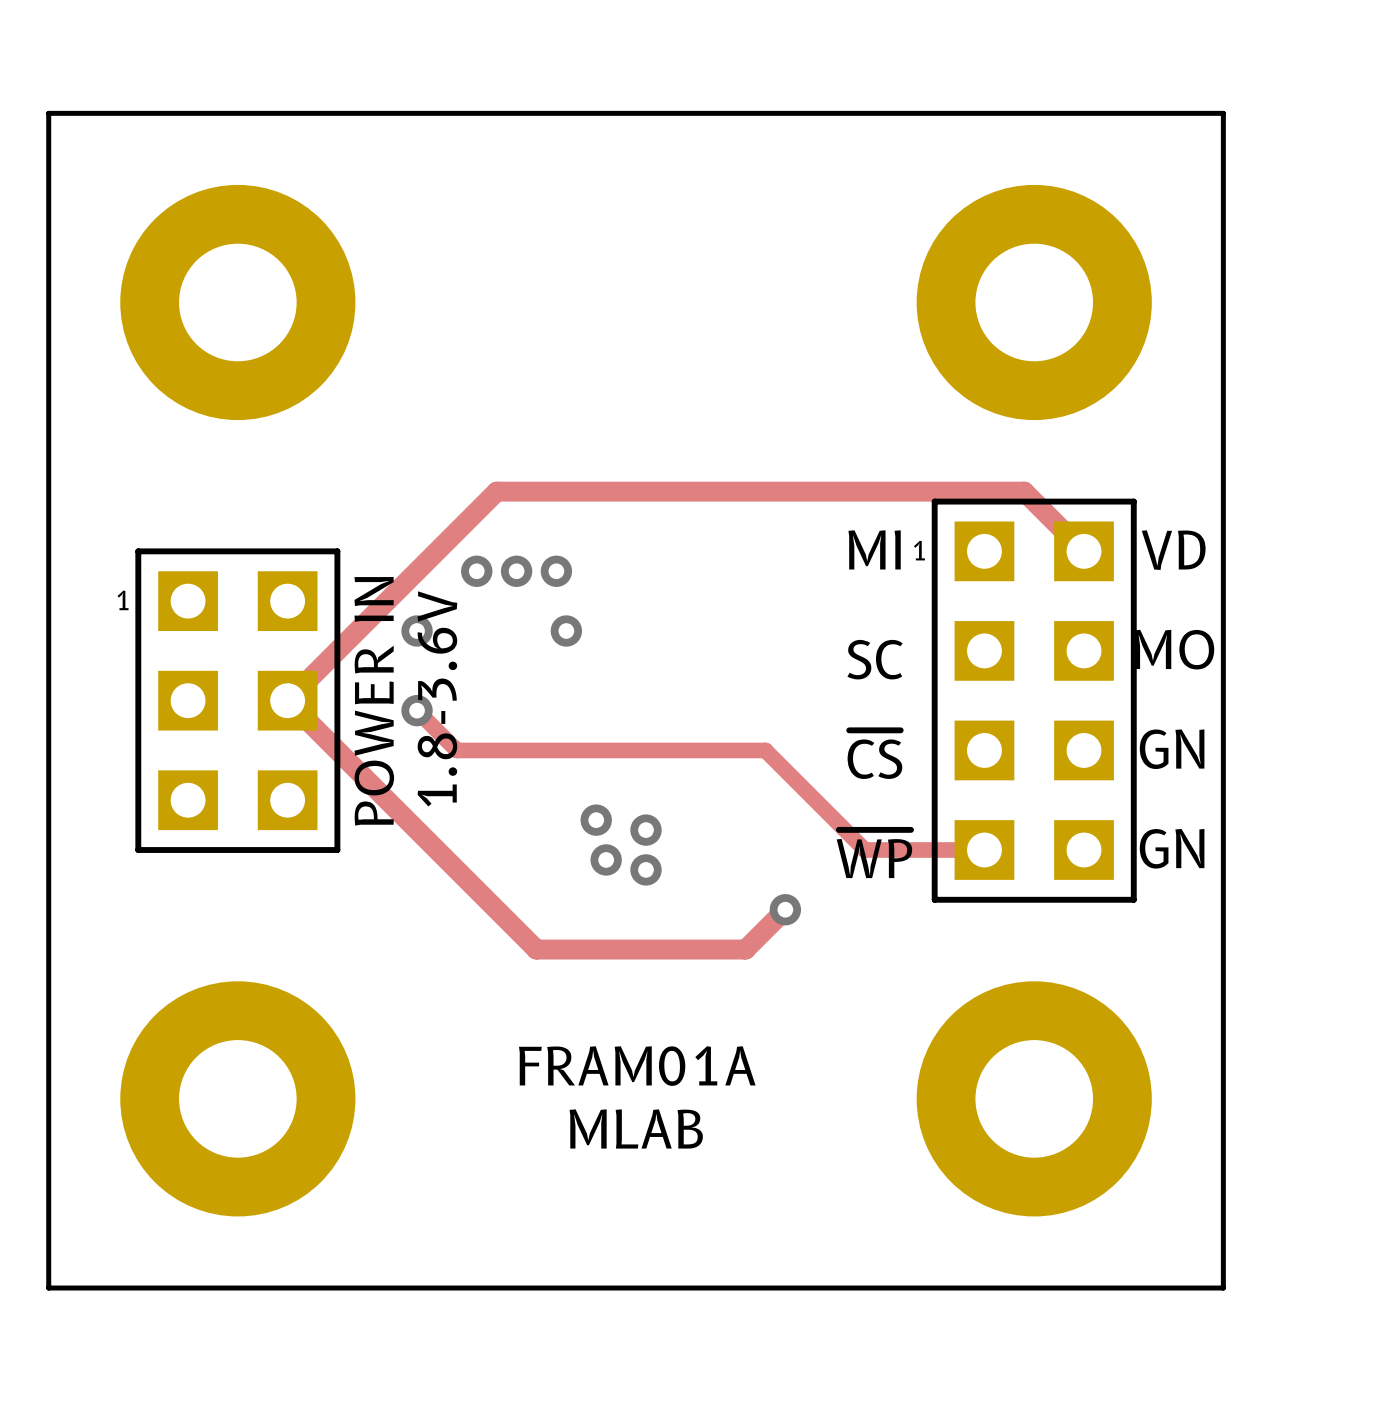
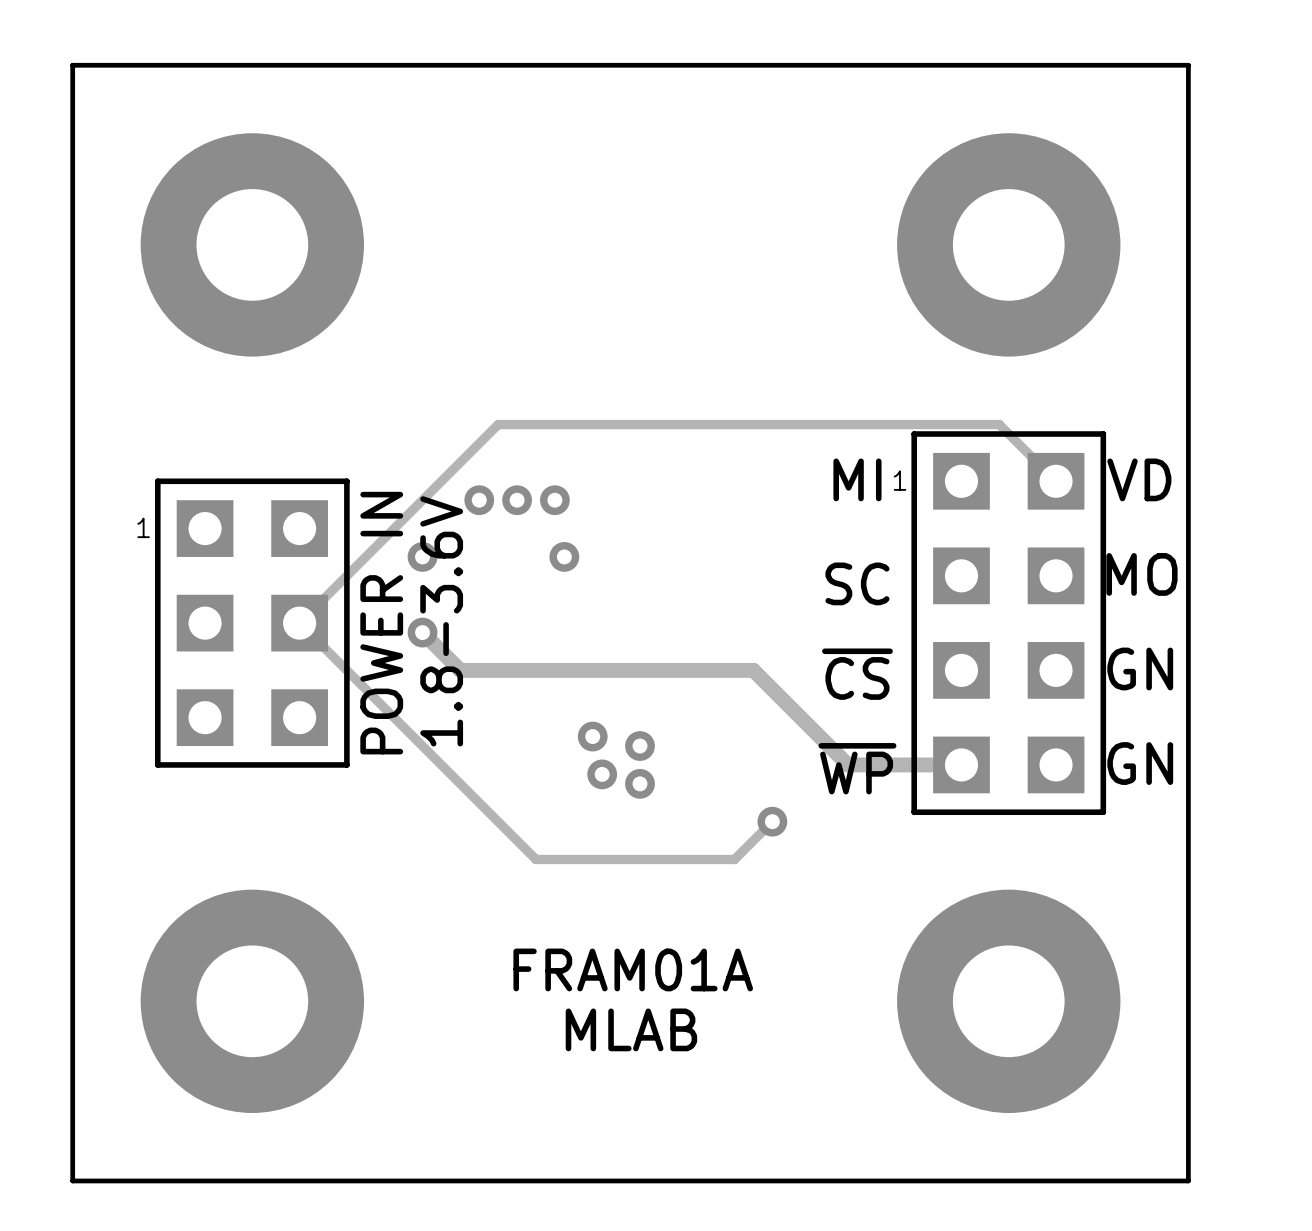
track width: thick (1084, 551) (1024, 491) (496, 491) (287, 700) (536, 949) (745, 949) (785, 909) -> thin (1056, 481) (999, 424) (498, 424) (299, 623) (536, 859) (734, 859) (772, 821)

